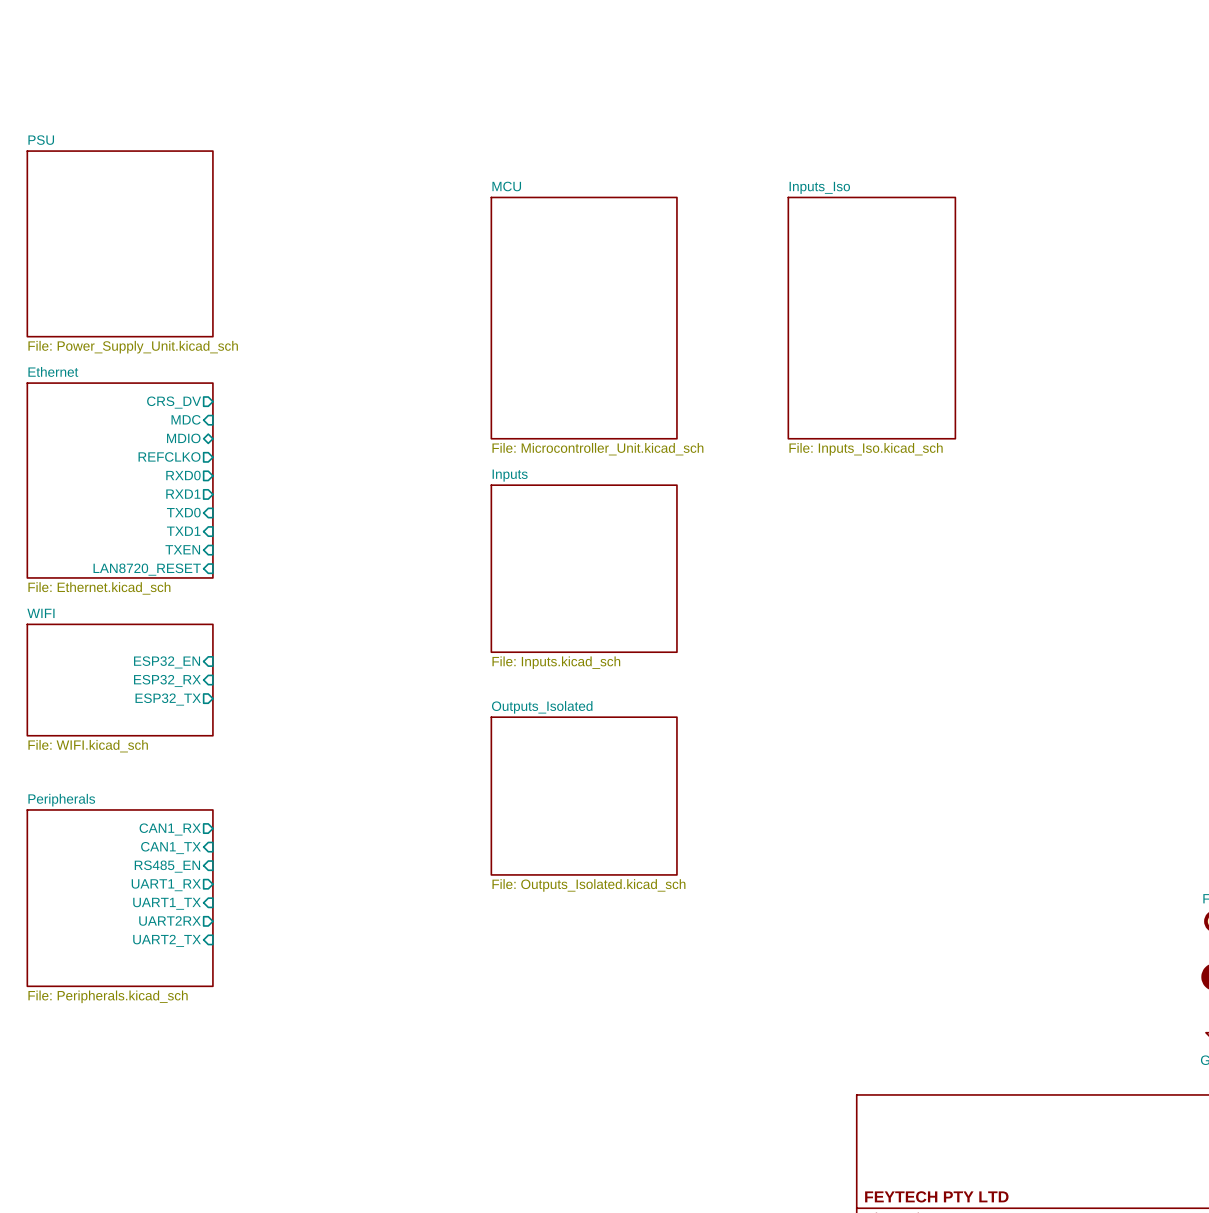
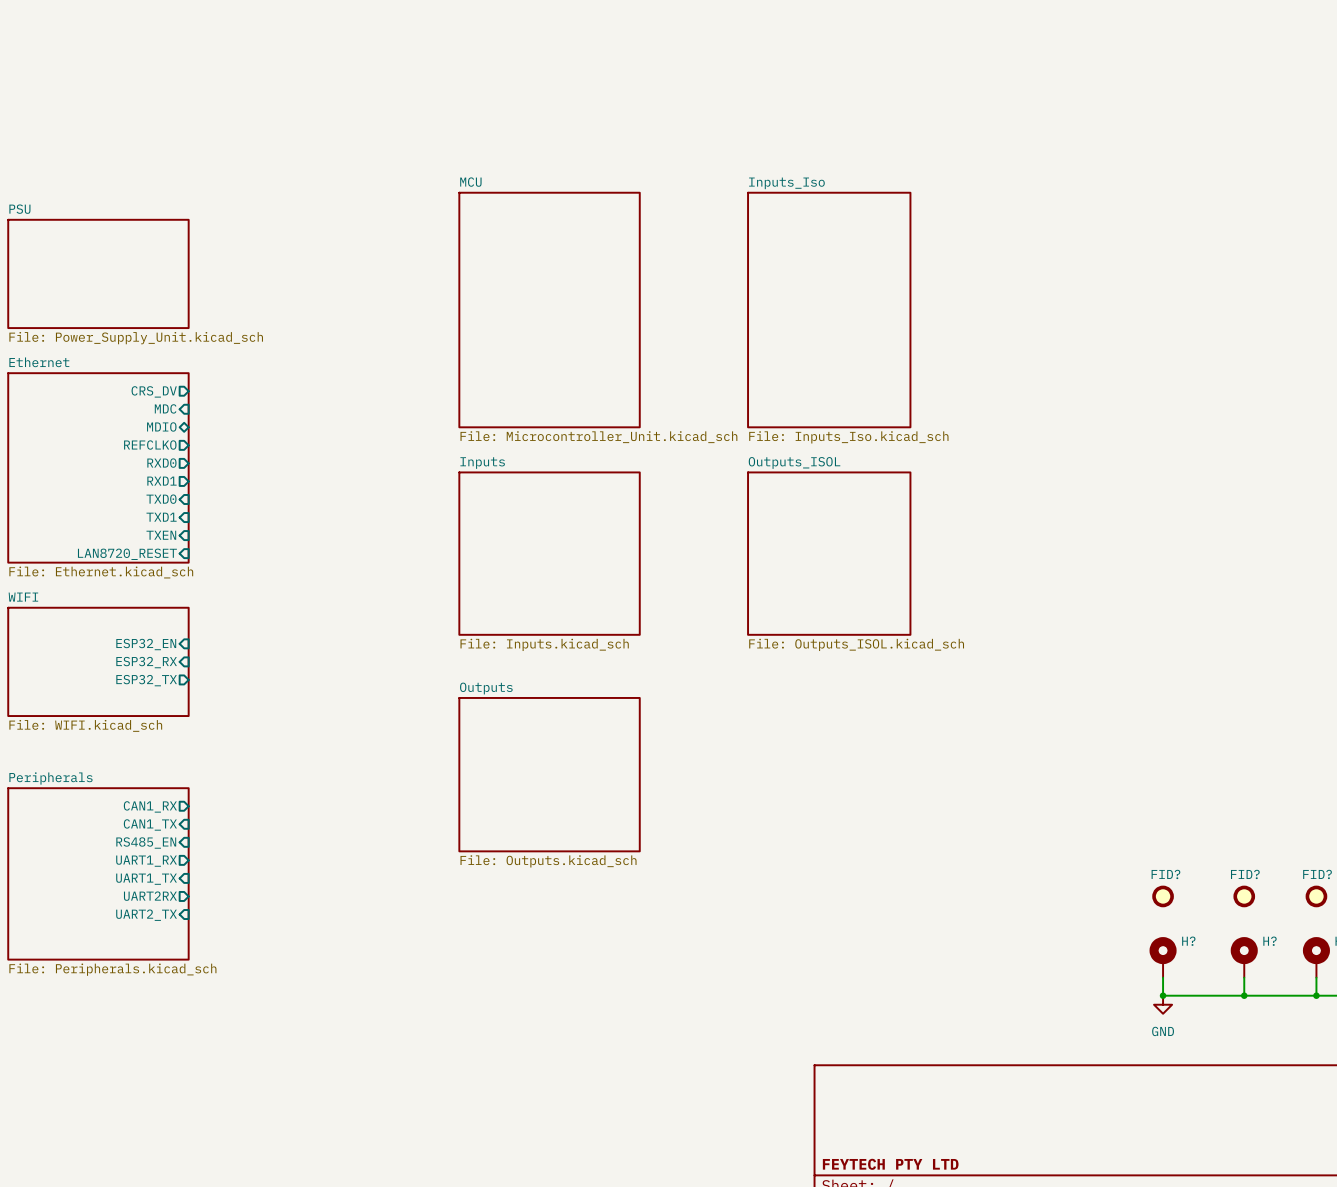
sheet PSU: File: Power_Supply_Unit.kicad_sch (120, 243) -> none
sheet PSU: none -> File: Power_Supply_Unit.kicad_sch (98, 273)
sheet Outputs_ISOL: none -> File: Outputs_ISOL.kicad_sch (829, 553)
sheet Outputs_Isolated name: Outputs_Isolated (542, 707) -> Outputs (486, 688)
sheet Outputs_Isolated value: File: Outputs_Isolated.kicad_sch (588, 885) -> File: Outputs.kicad_sch (548, 861)

